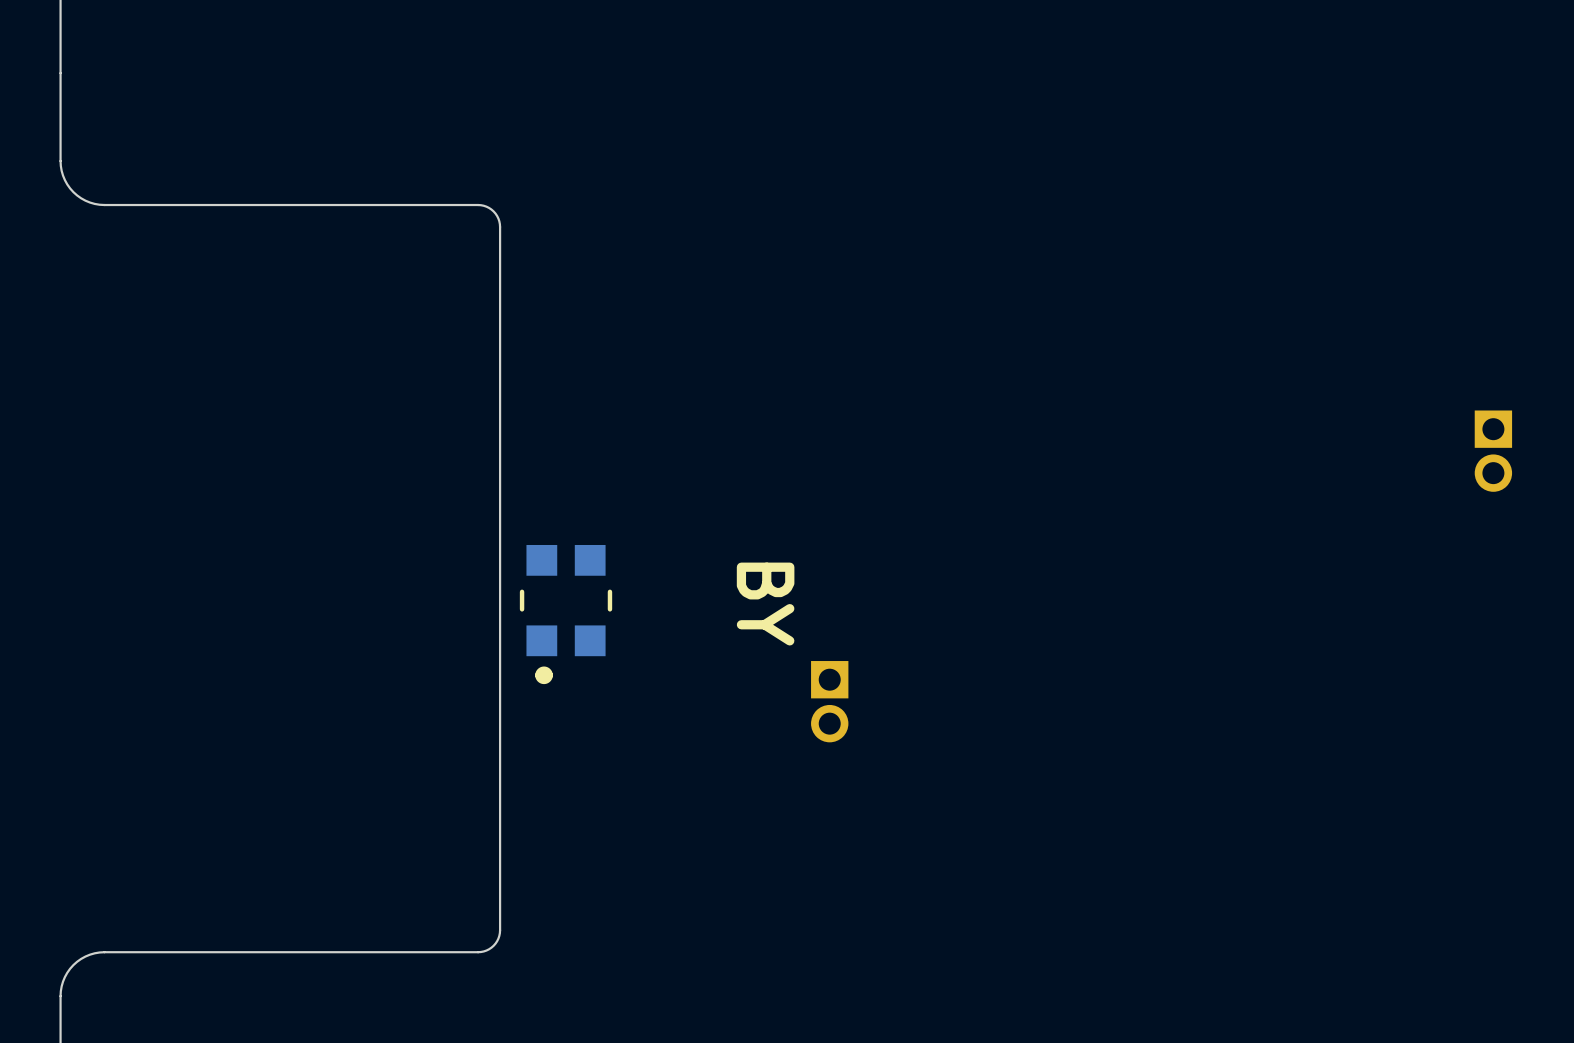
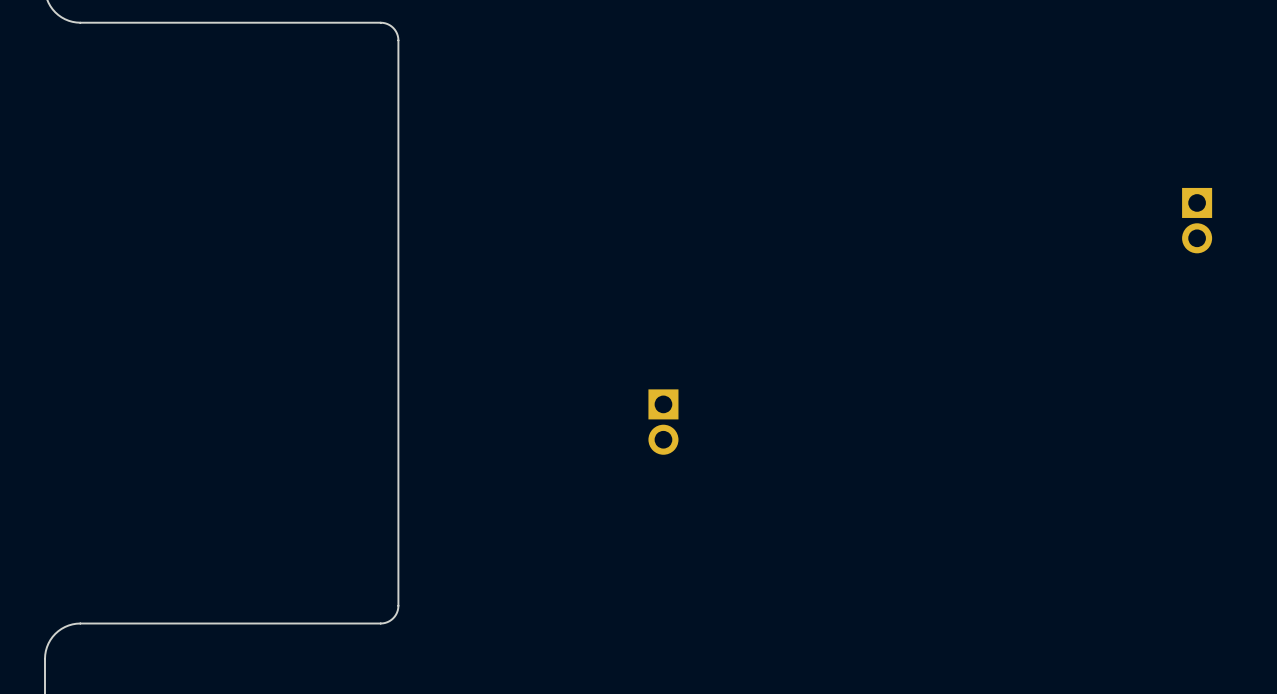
text: BY (765, 604) -> none
part: (566, 614) -> none

